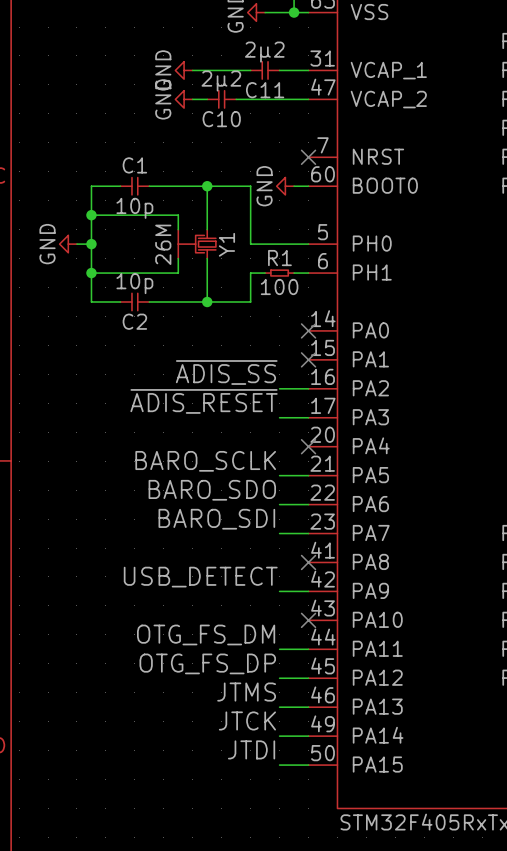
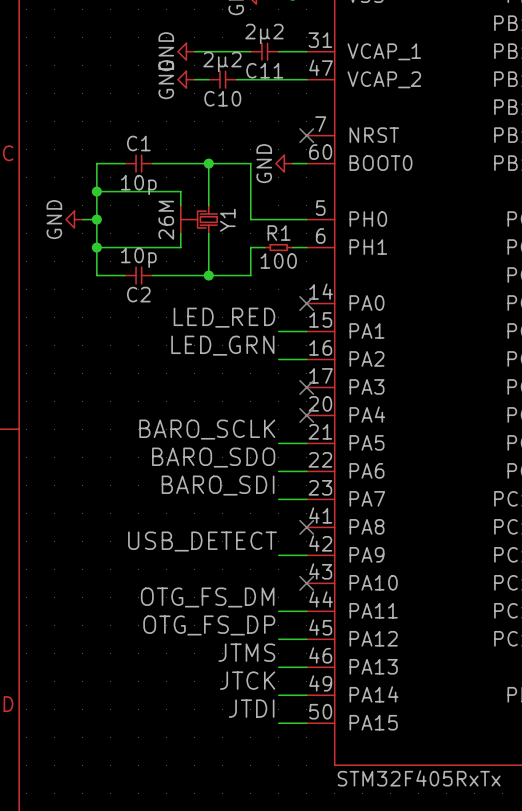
label: none -> LED_RED (224, 317)
no-connect mark position: (308, 359) -> (306, 387)
label: ~{ADIS_SS} (226, 372) -> LED_GRN (222, 345)
label: ~{ADIS_RESET} (204, 401) -> none
wire: (279, 417) (308, 417) -> (278, 331) (306, 331)

